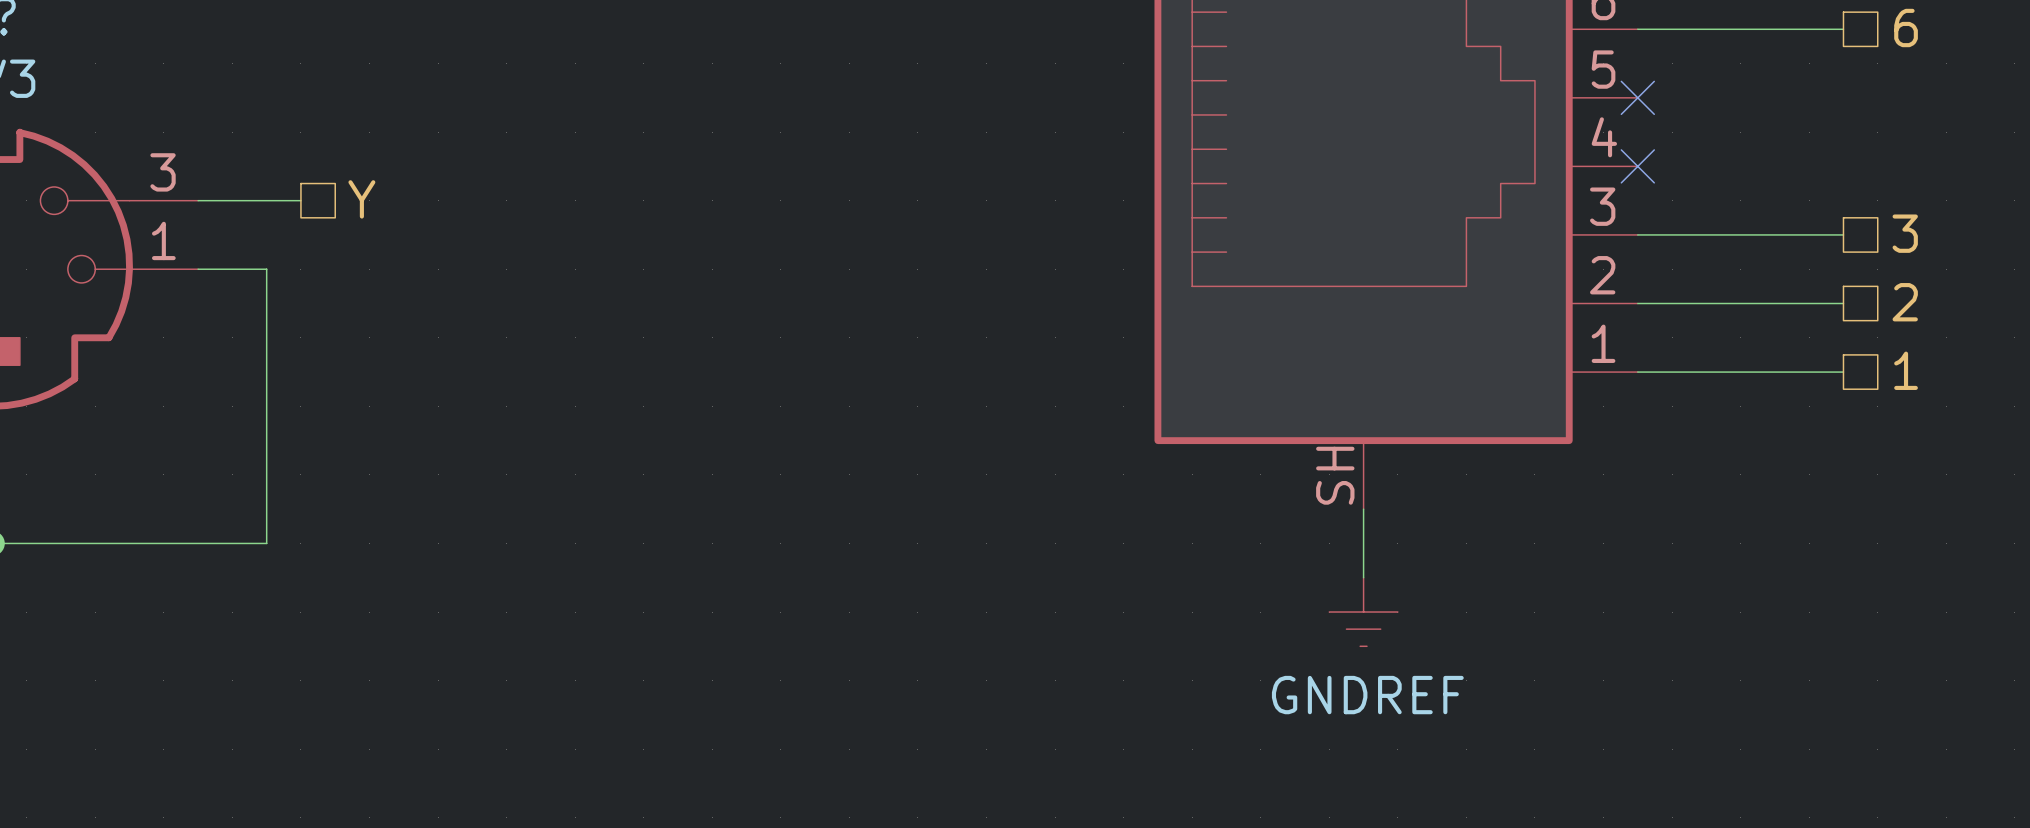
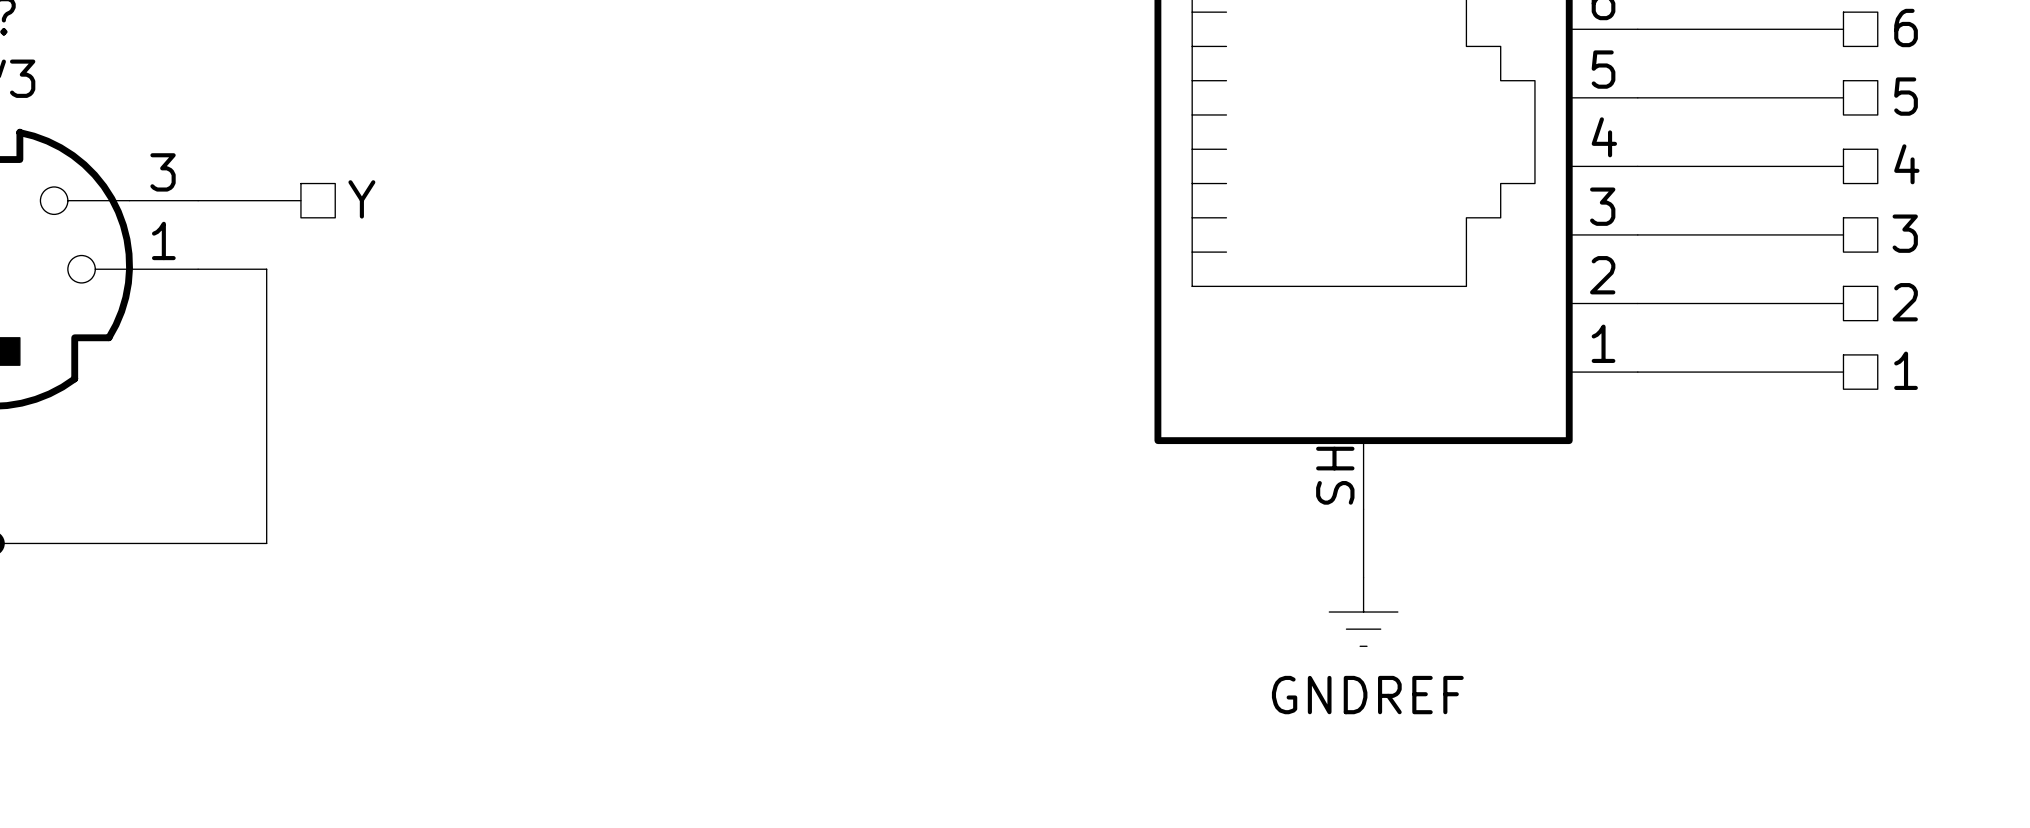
hierarchical label: none -> 5 (1906, 96)
wire: none -> (1637, 97) (1843, 97)
no-connect mark: (1637, 97) -> none
hierarchical label: none -> 4 (1906, 164)
wire: none -> (1637, 166) (1843, 166)
no-connect mark: (1637, 166) -> none

